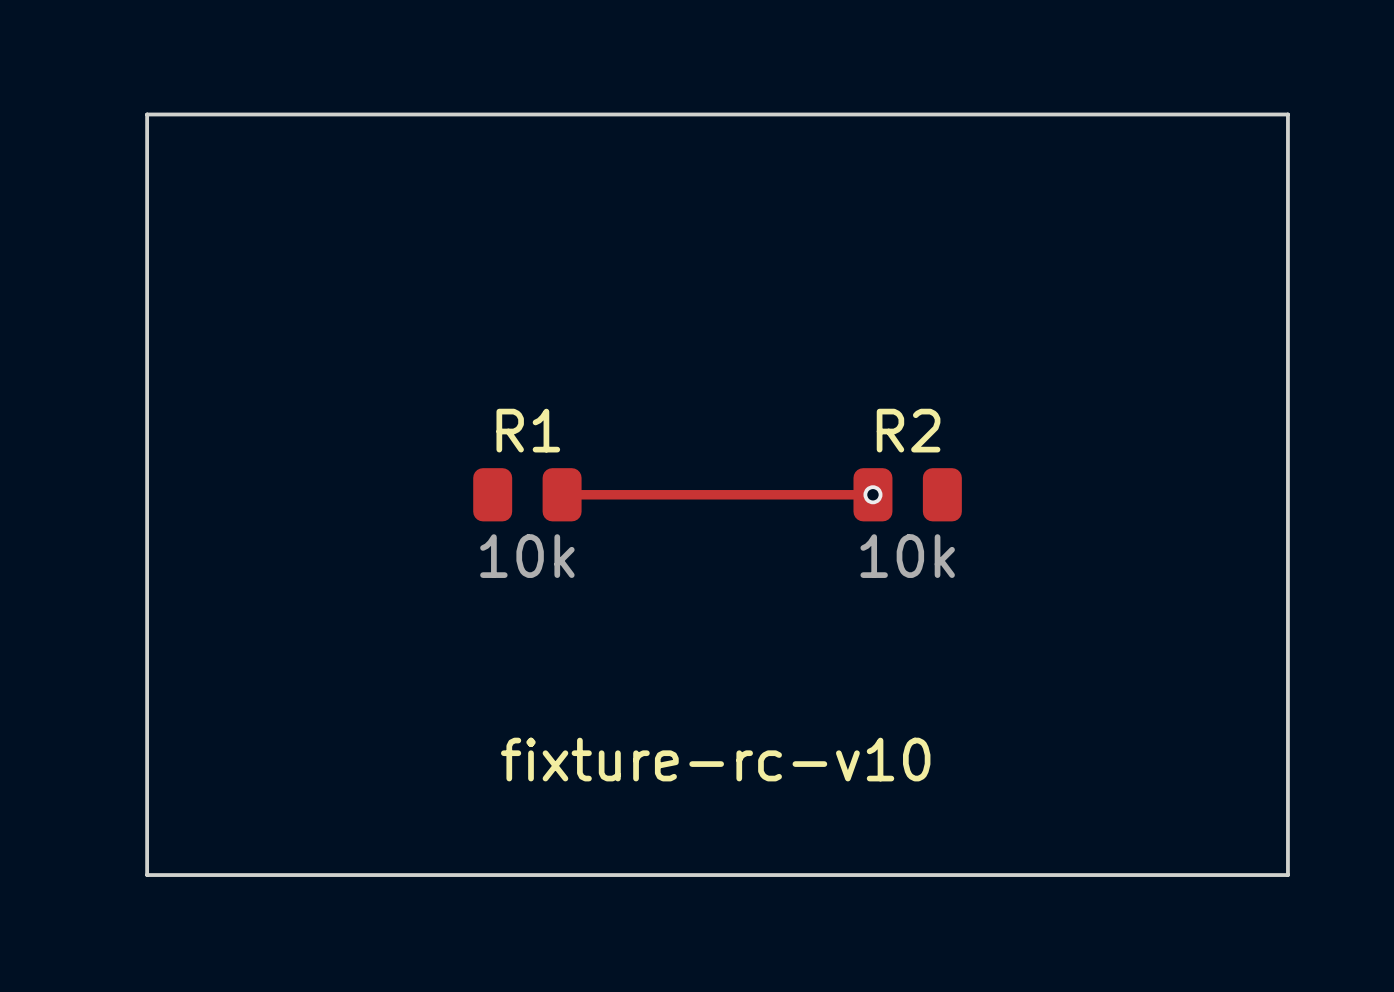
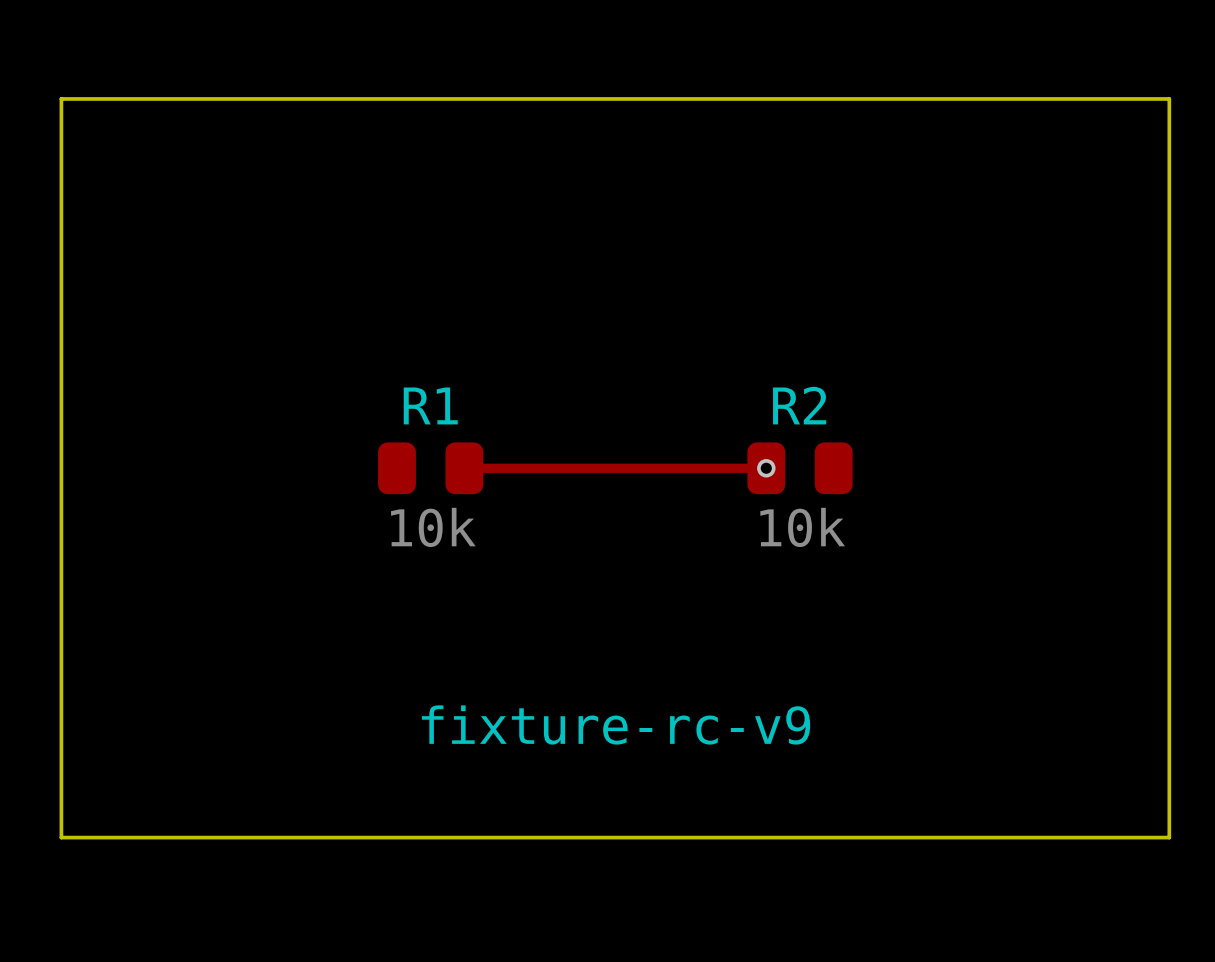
text: fixture-rc-v10 (715, 759) -> fixture-rc-v9 (616, 724)

